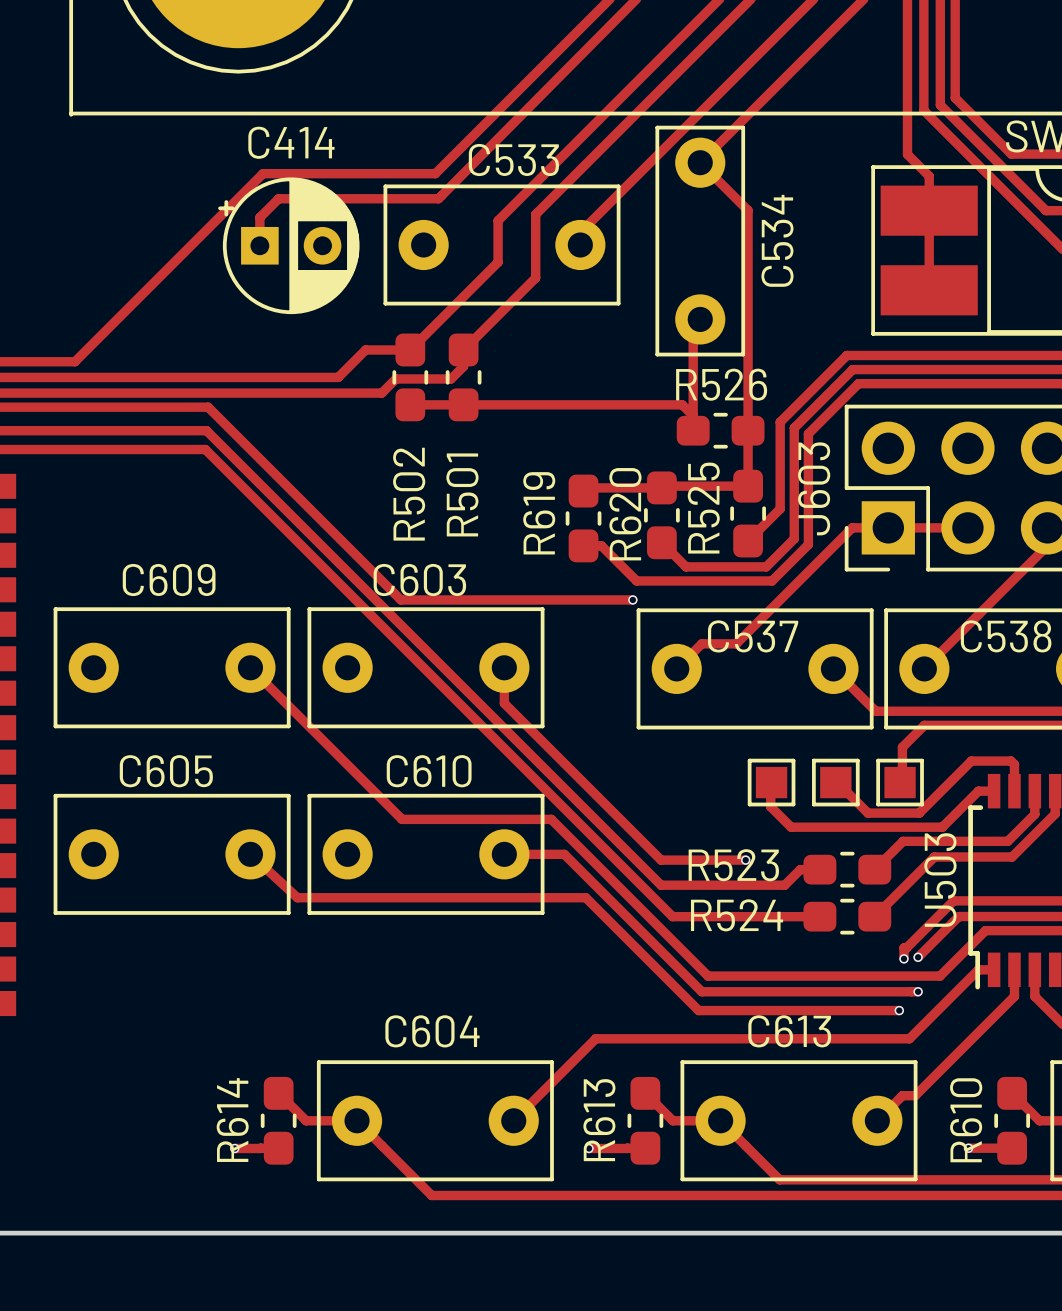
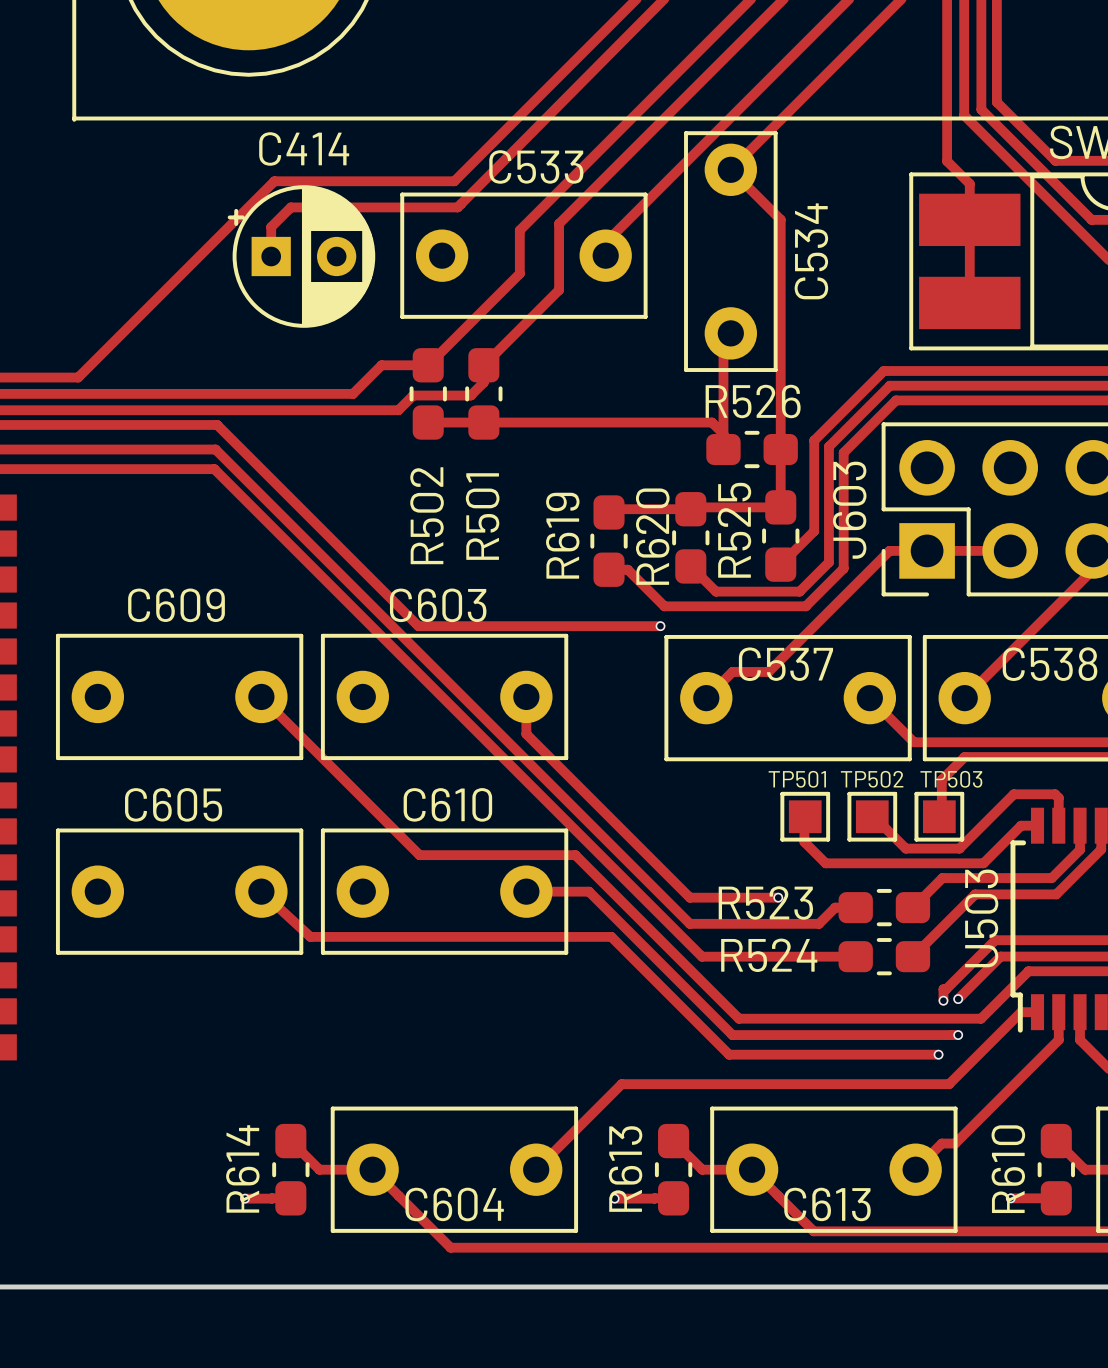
TP501 name: none -> TP501 (797, 779)
TP502 name: none -> TP502 (872, 779)
TP503 name: none -> TP503 (951, 779)
C604 name position: C604 (432, 1031) -> C604 (454, 1204)
C613 name position: C613 (789, 1031) -> C613 (827, 1204)

